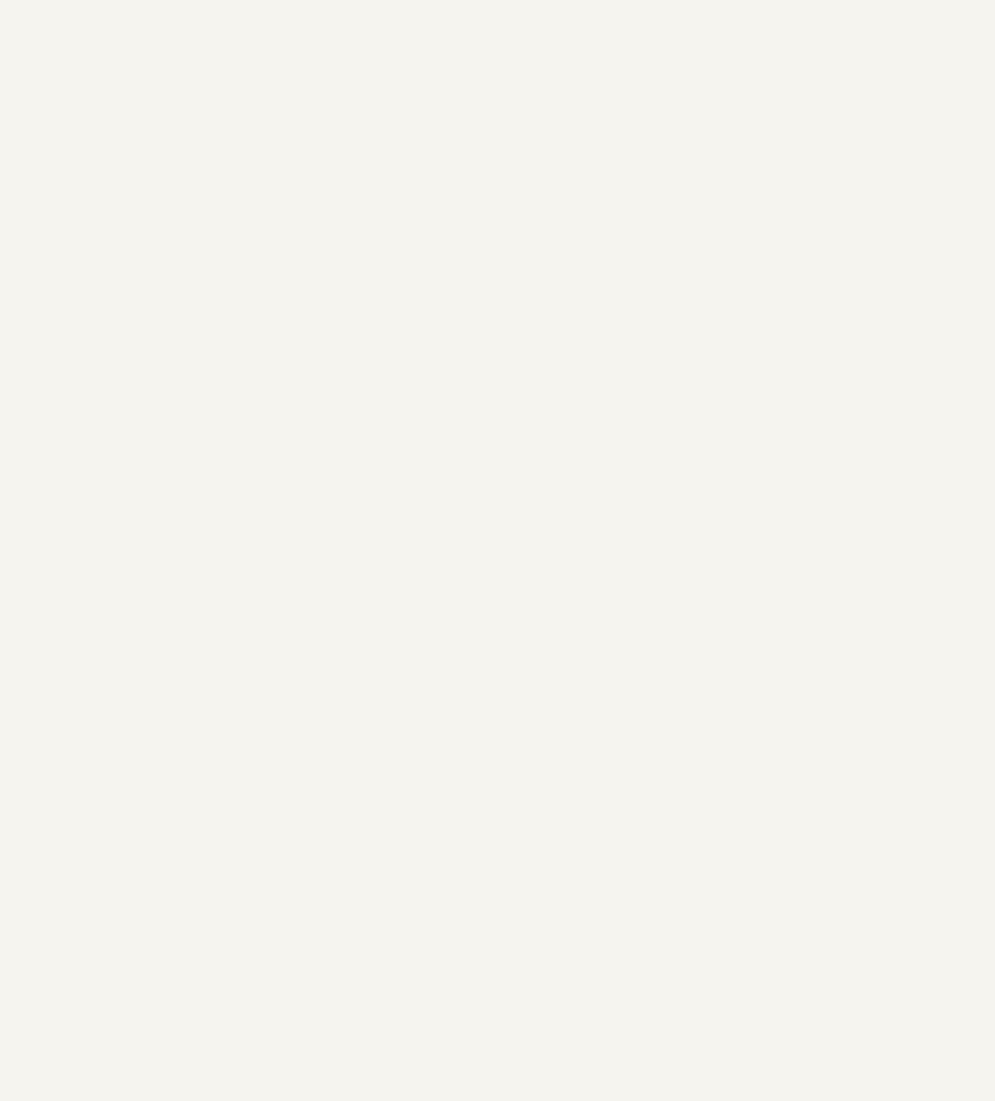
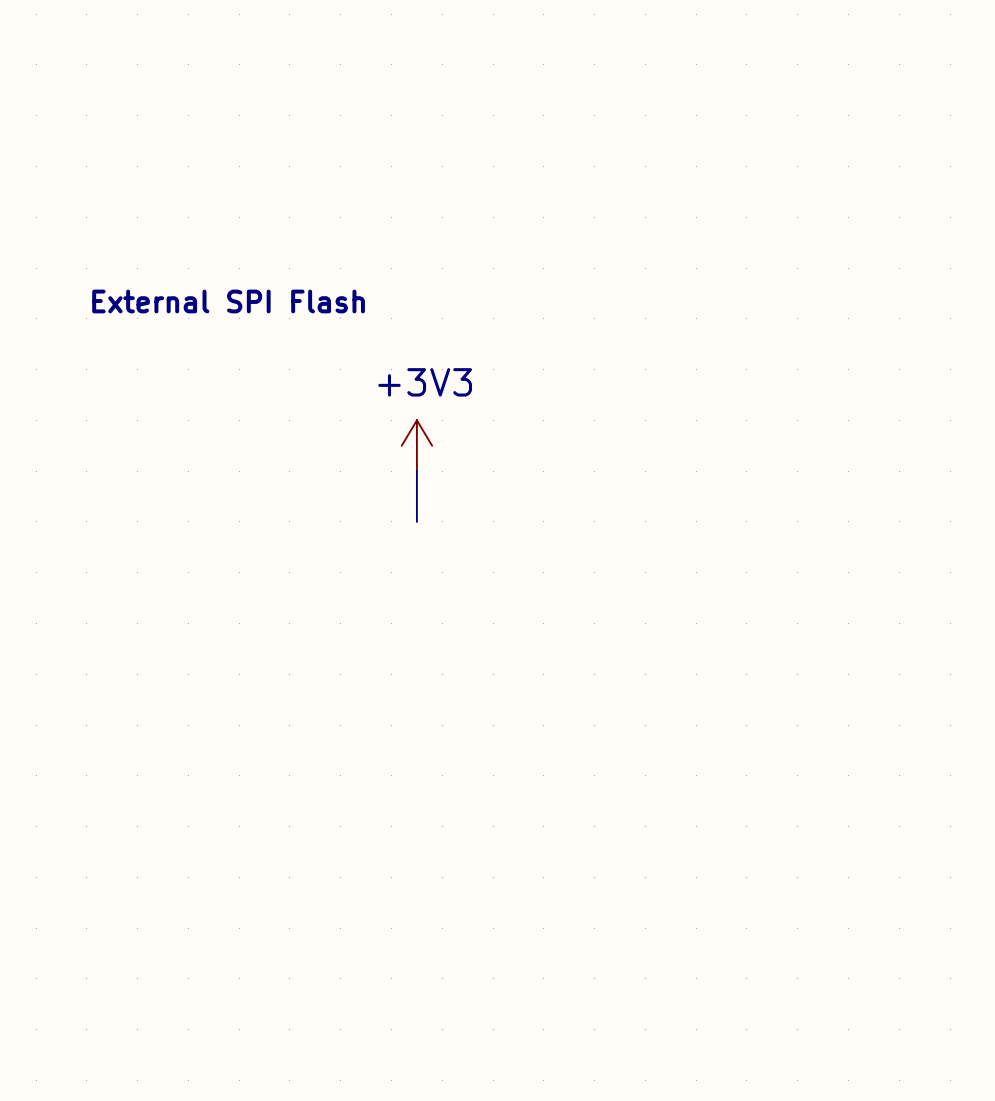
text: none -> External SPI Flash (228, 301)
power symbol: none -> +3V3 (416, 445)
wire: none -> (416, 471) (416, 521)

